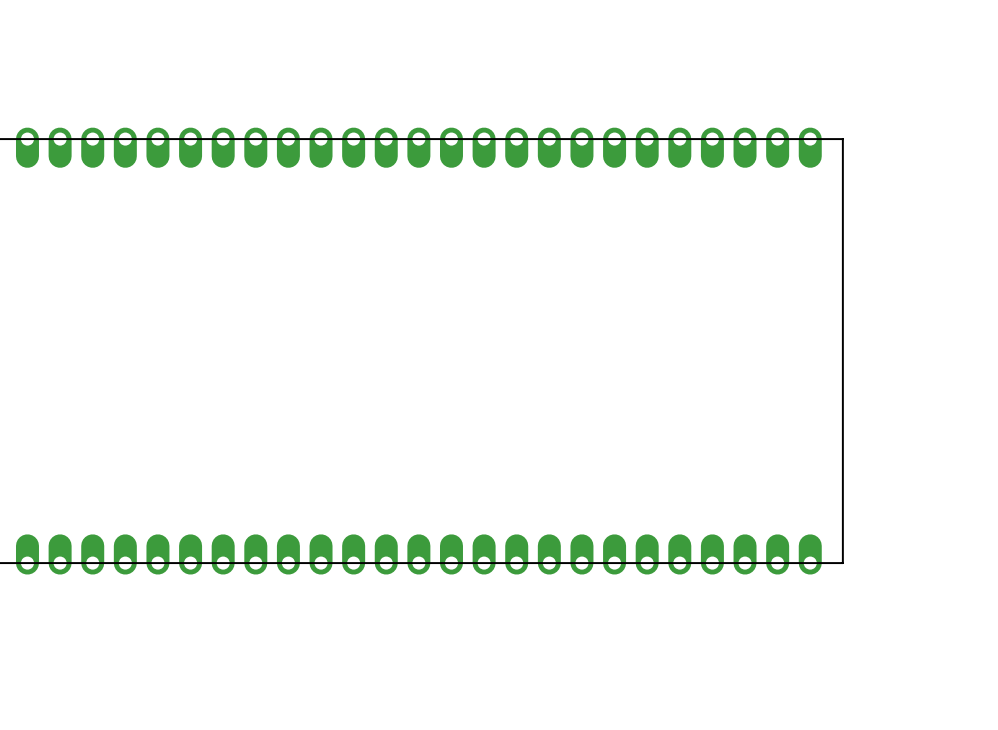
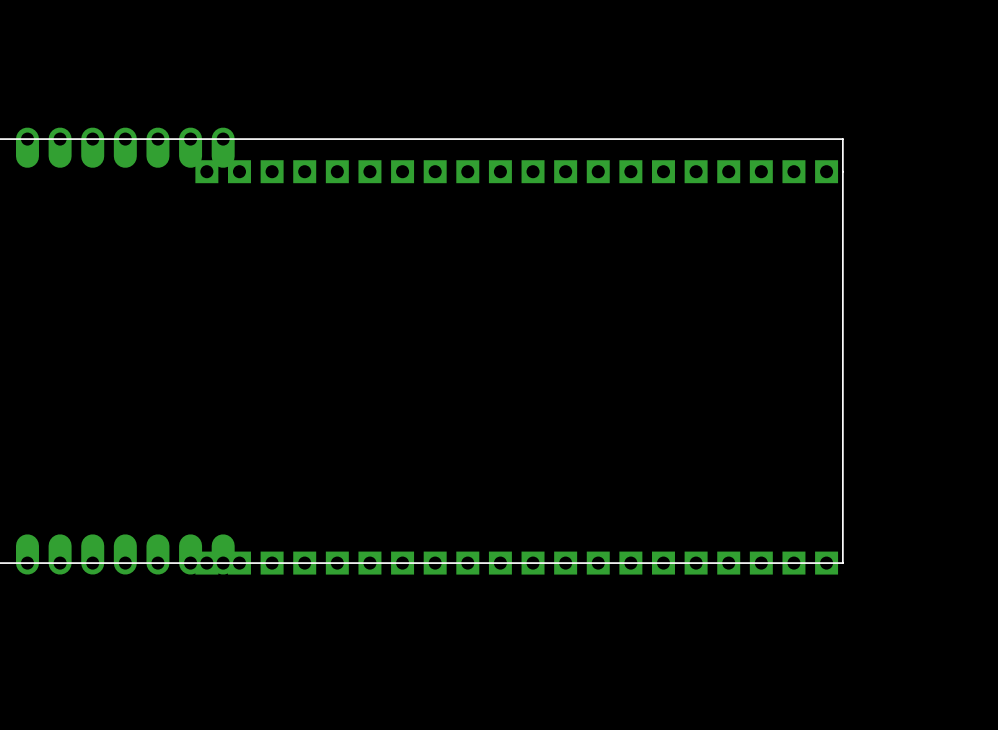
part footprint: [244, 127, 561, 168] -> [195, 160, 578, 184]
part footprint: [570, 127, 822, 168] -> [586, 160, 839, 184]
part footprint: [244, 534, 561, 575] -> [195, 551, 578, 575]
part footprint: [570, 534, 822, 575] -> [586, 551, 839, 575]

